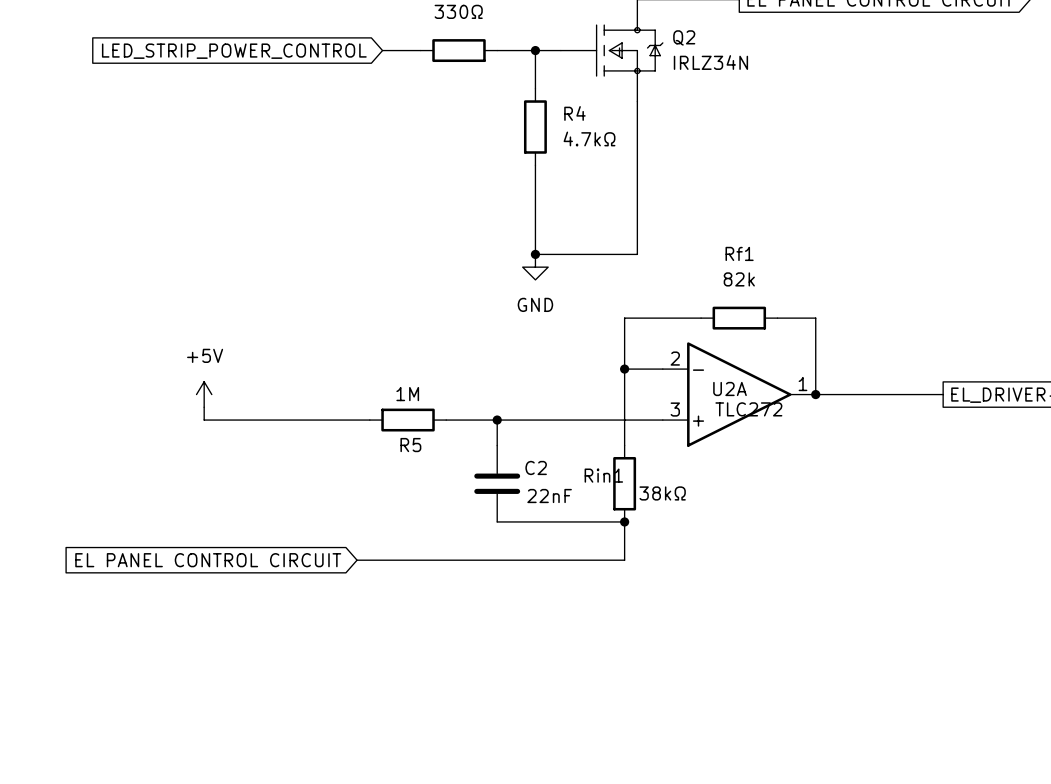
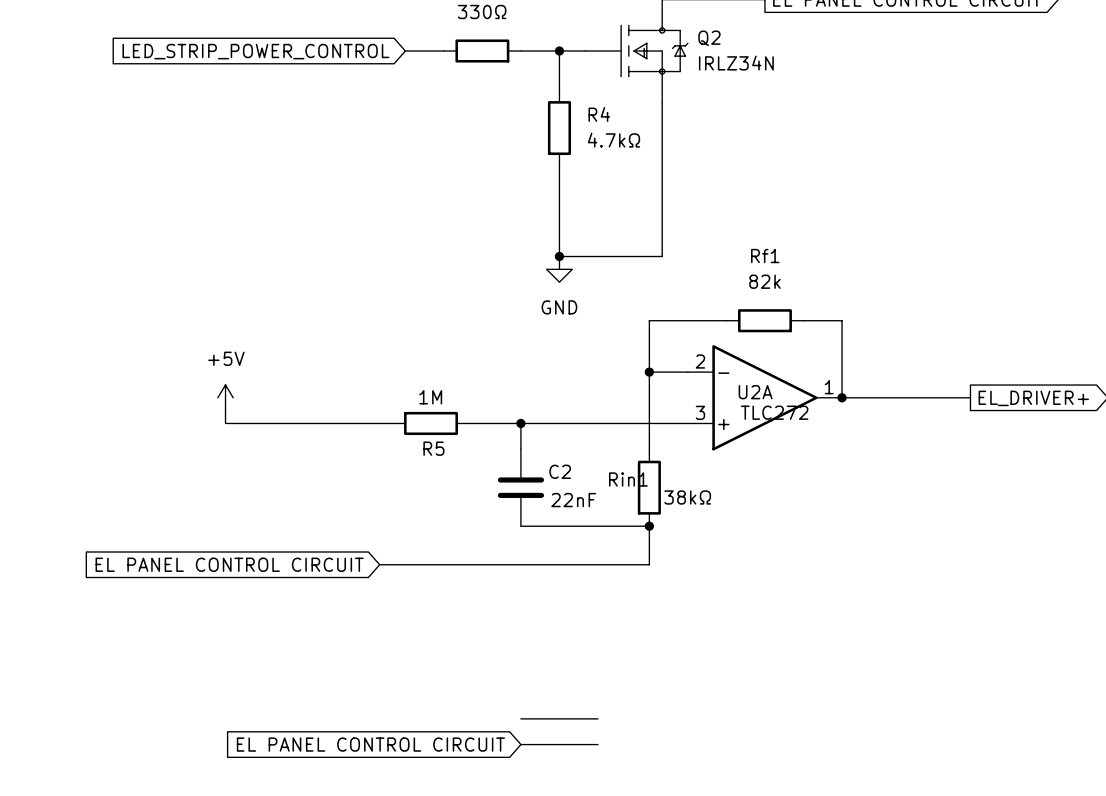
wire: none -> (520, 718) (597, 718)
global label: none -> EL PANEL CONTROL CIRCUIT (370, 744)
wire: none -> (520, 744) (597, 744)

